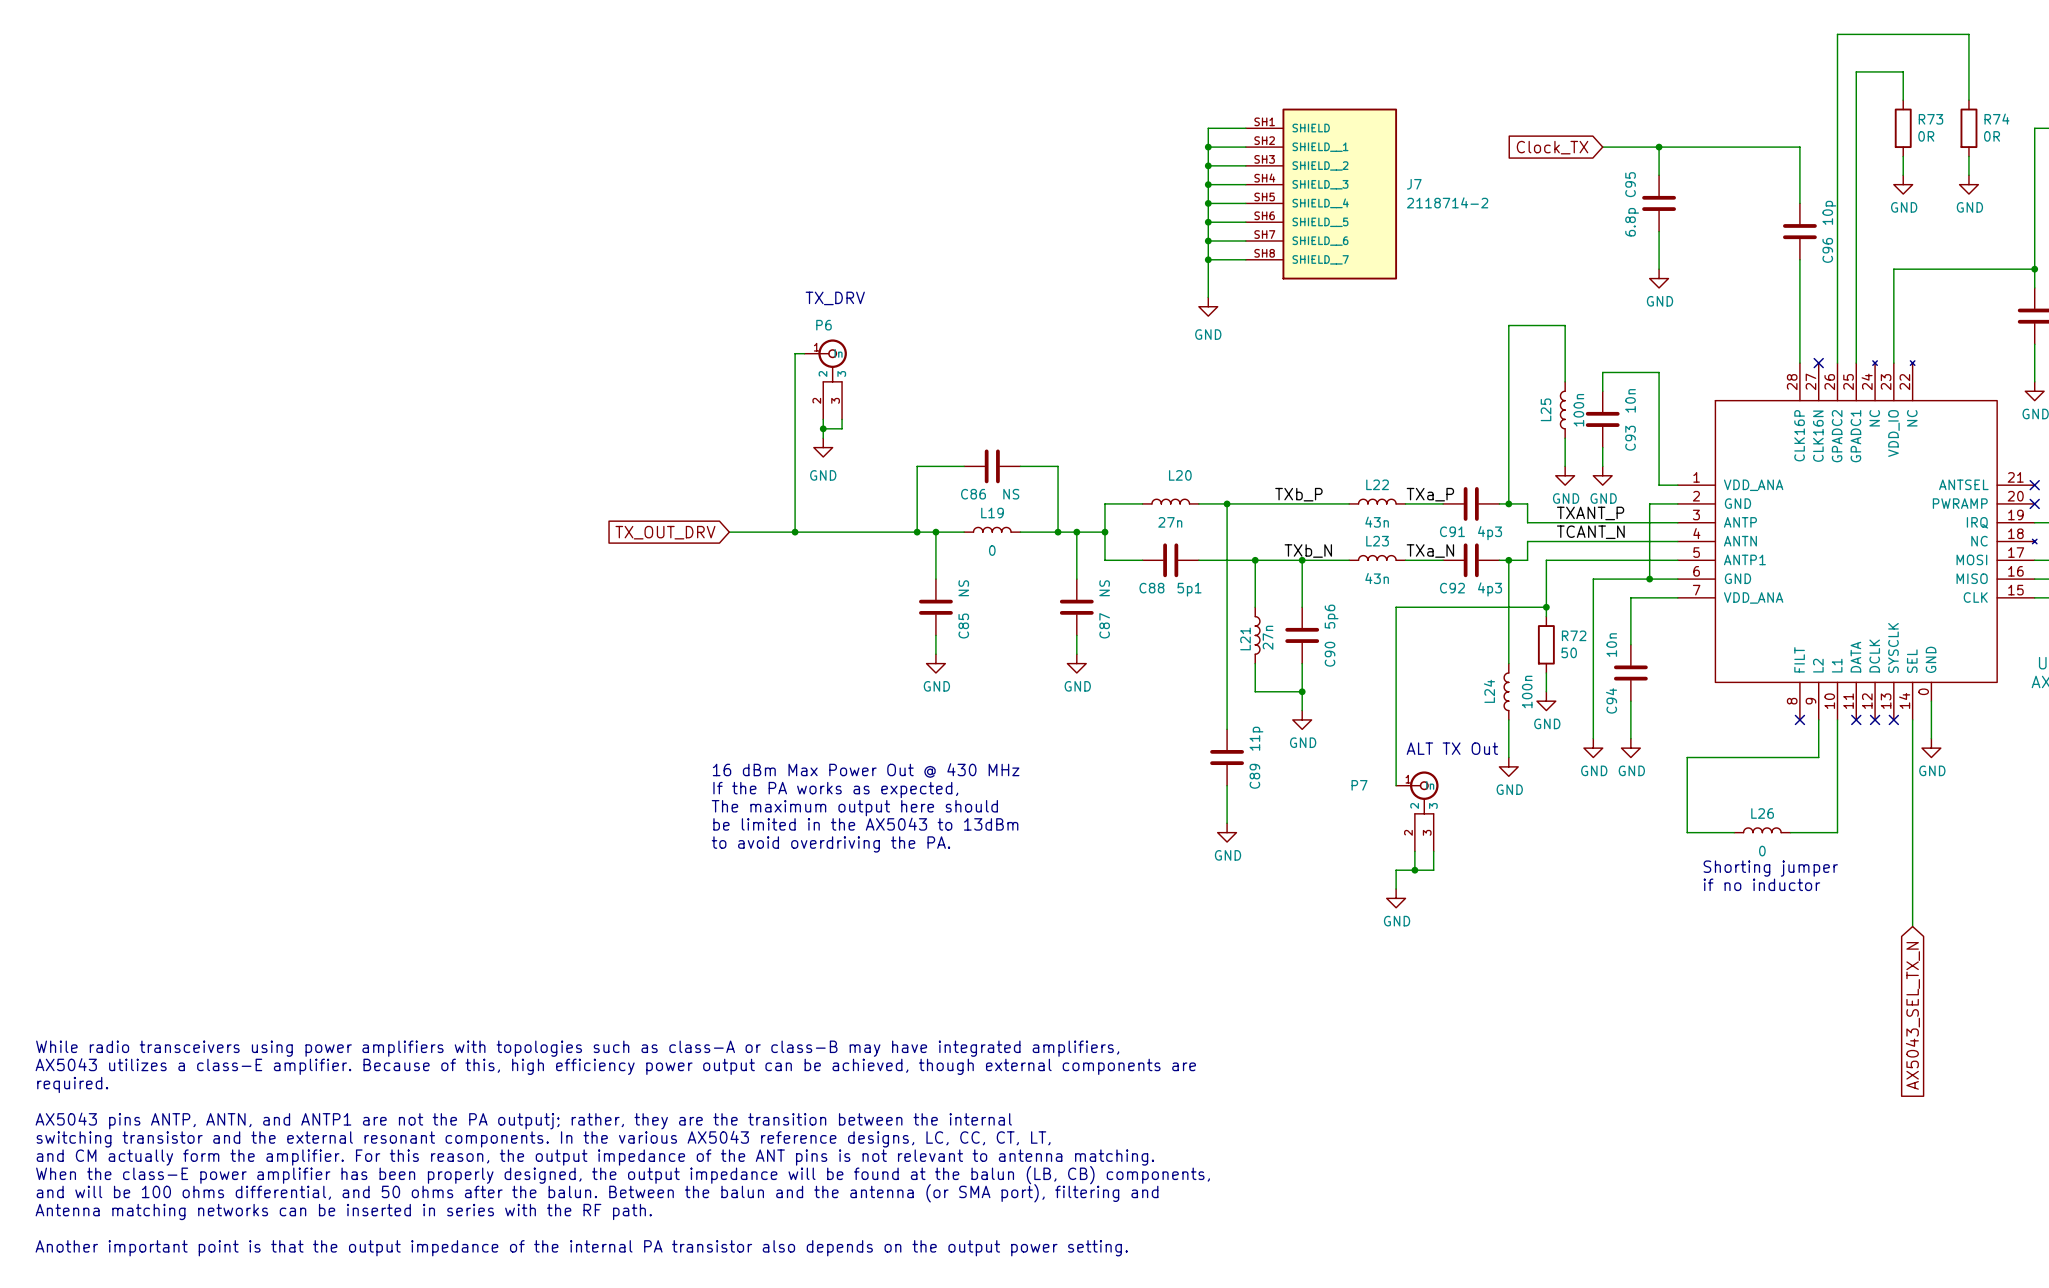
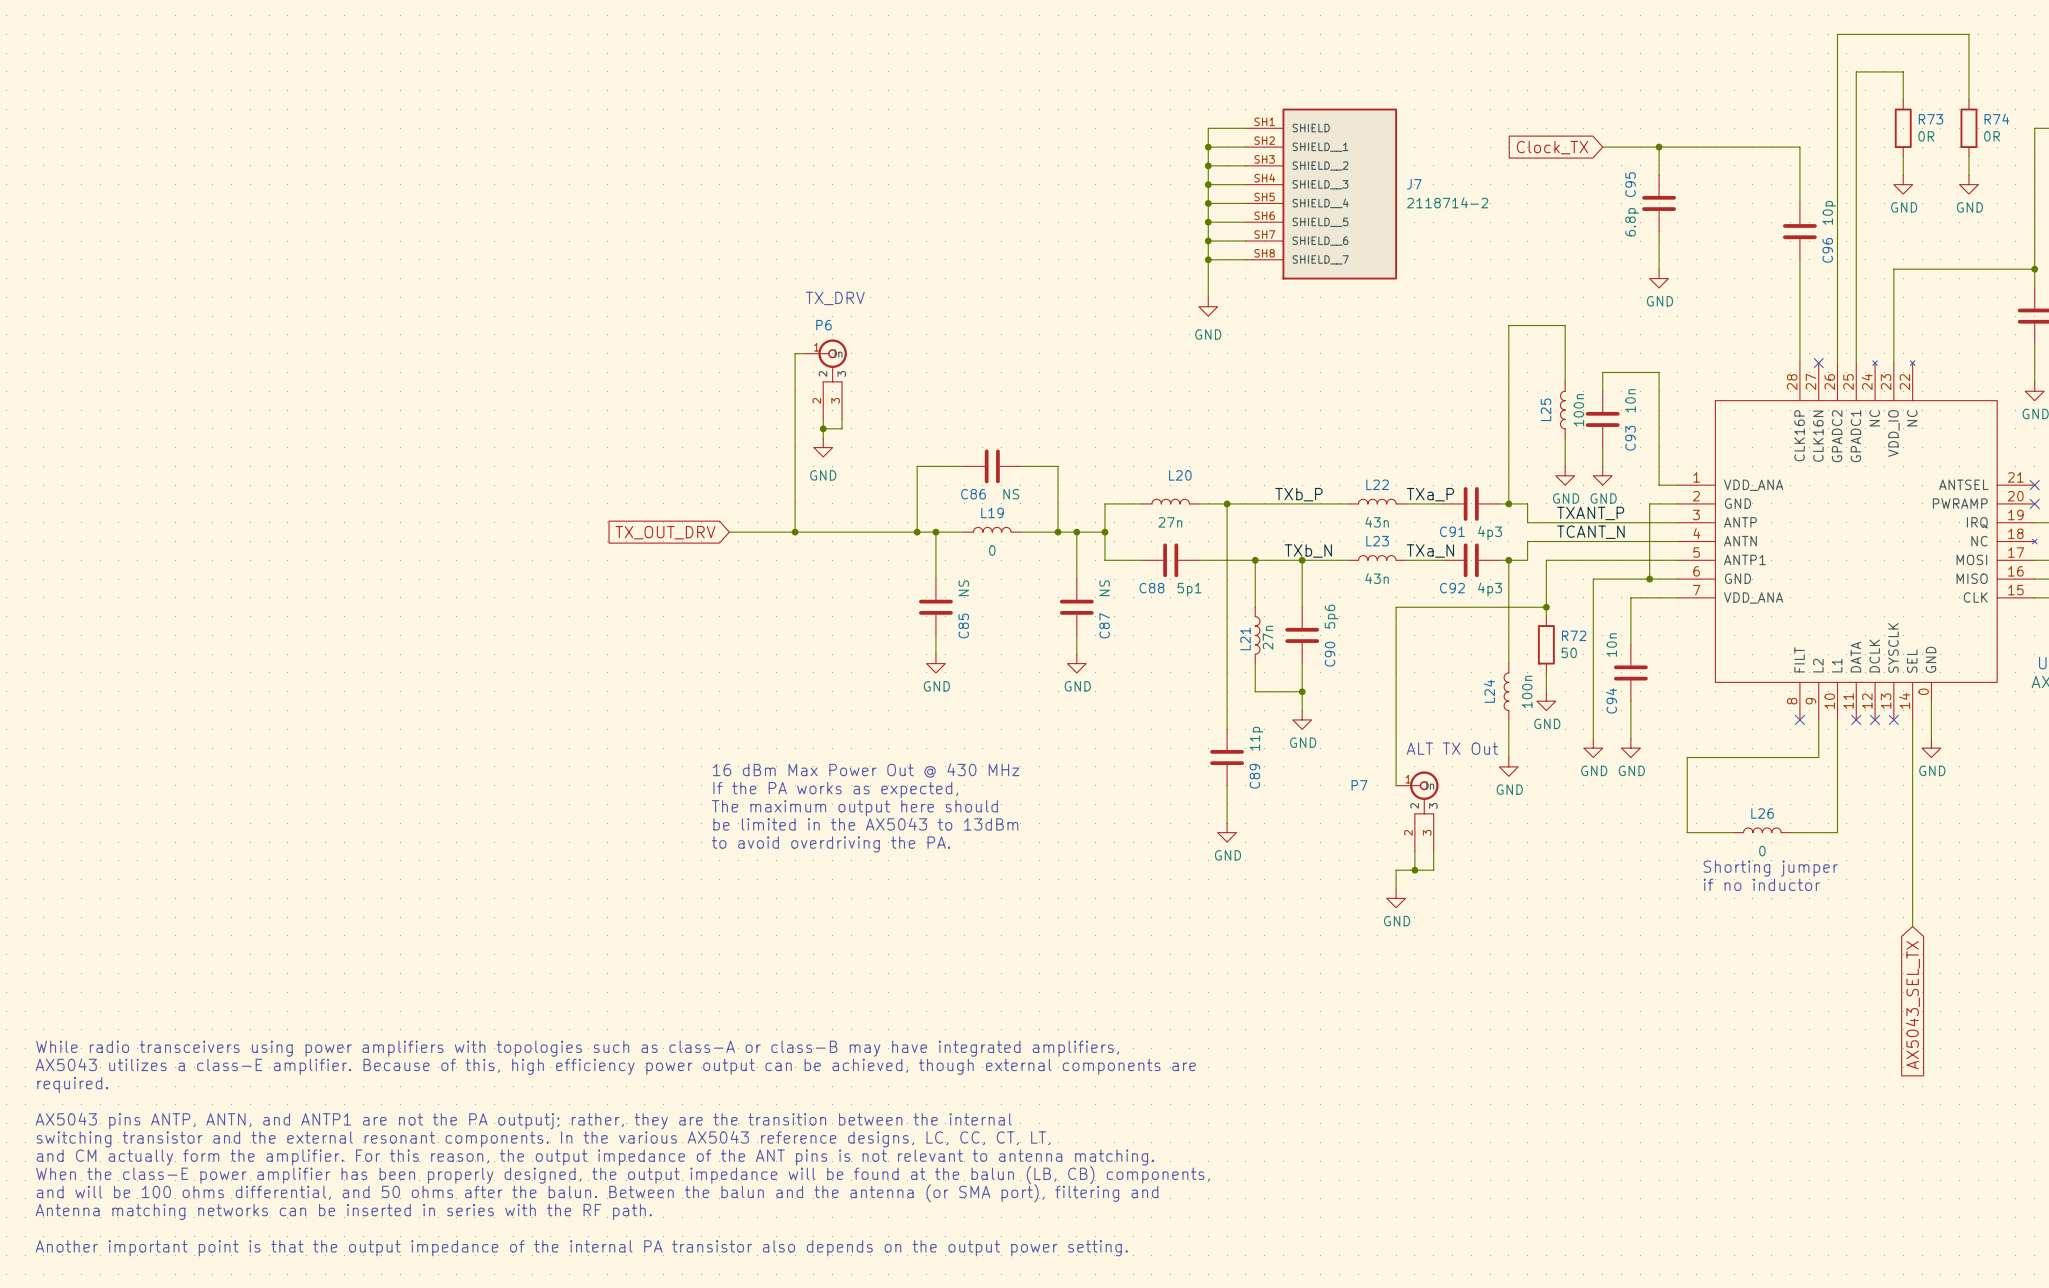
global label: AX5043_SEL_TX_N (1912, 1015) -> AX5043_SEL_TX (1912, 1005)

